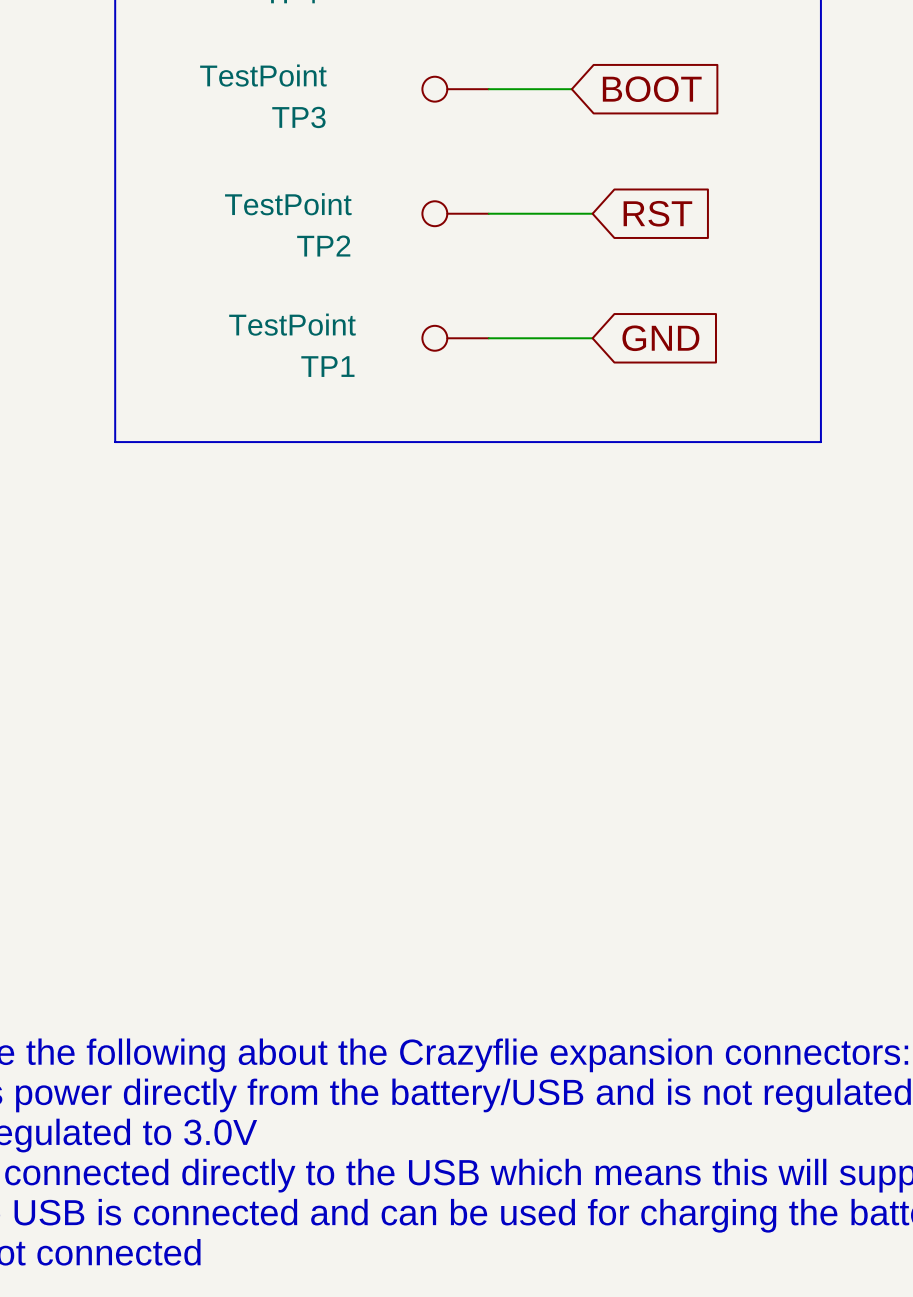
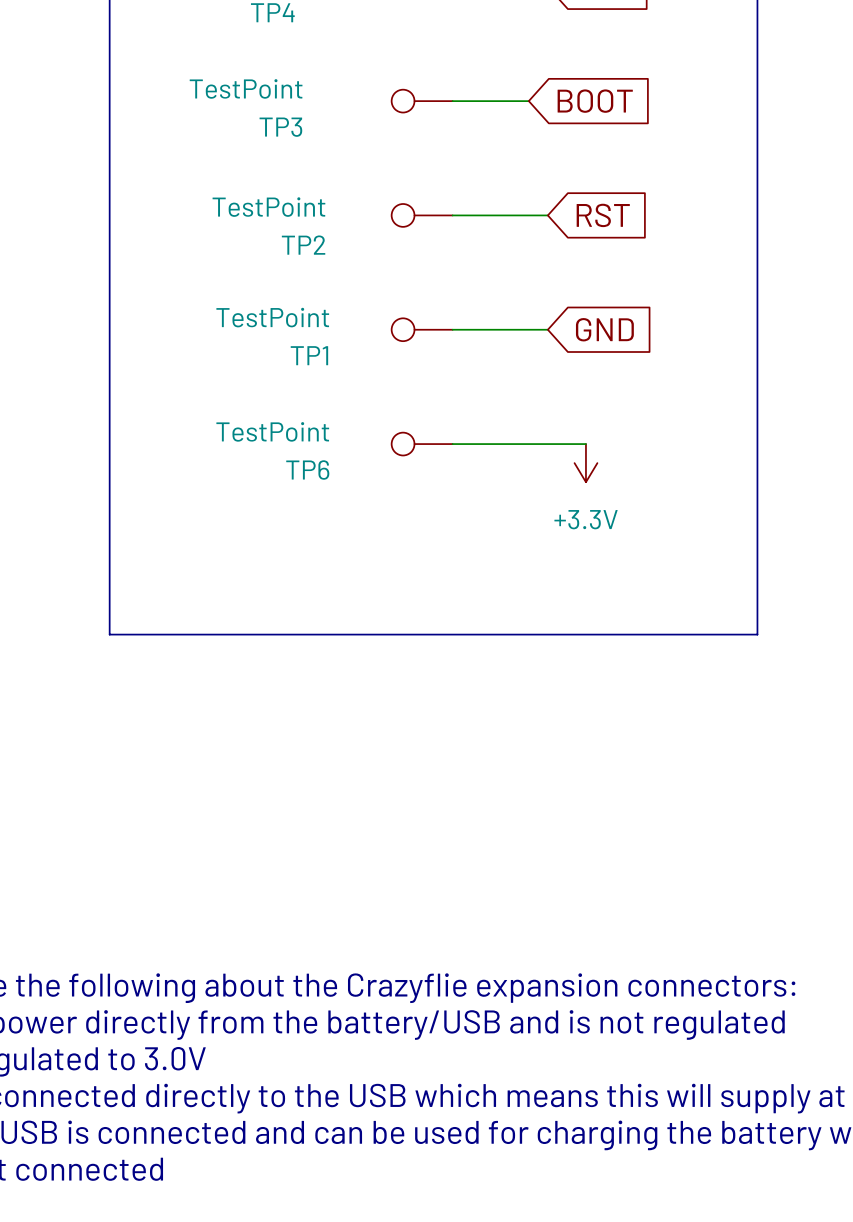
line: (115, 442) (820, 442) -> (109, 425) (109, 634) (757, 634) (757, 425)
TP6: none -> TestPoint (422, 444)
wire: none -> (452, 444) (585, 444)
power symbol: none -> +3.3V (585, 463)

